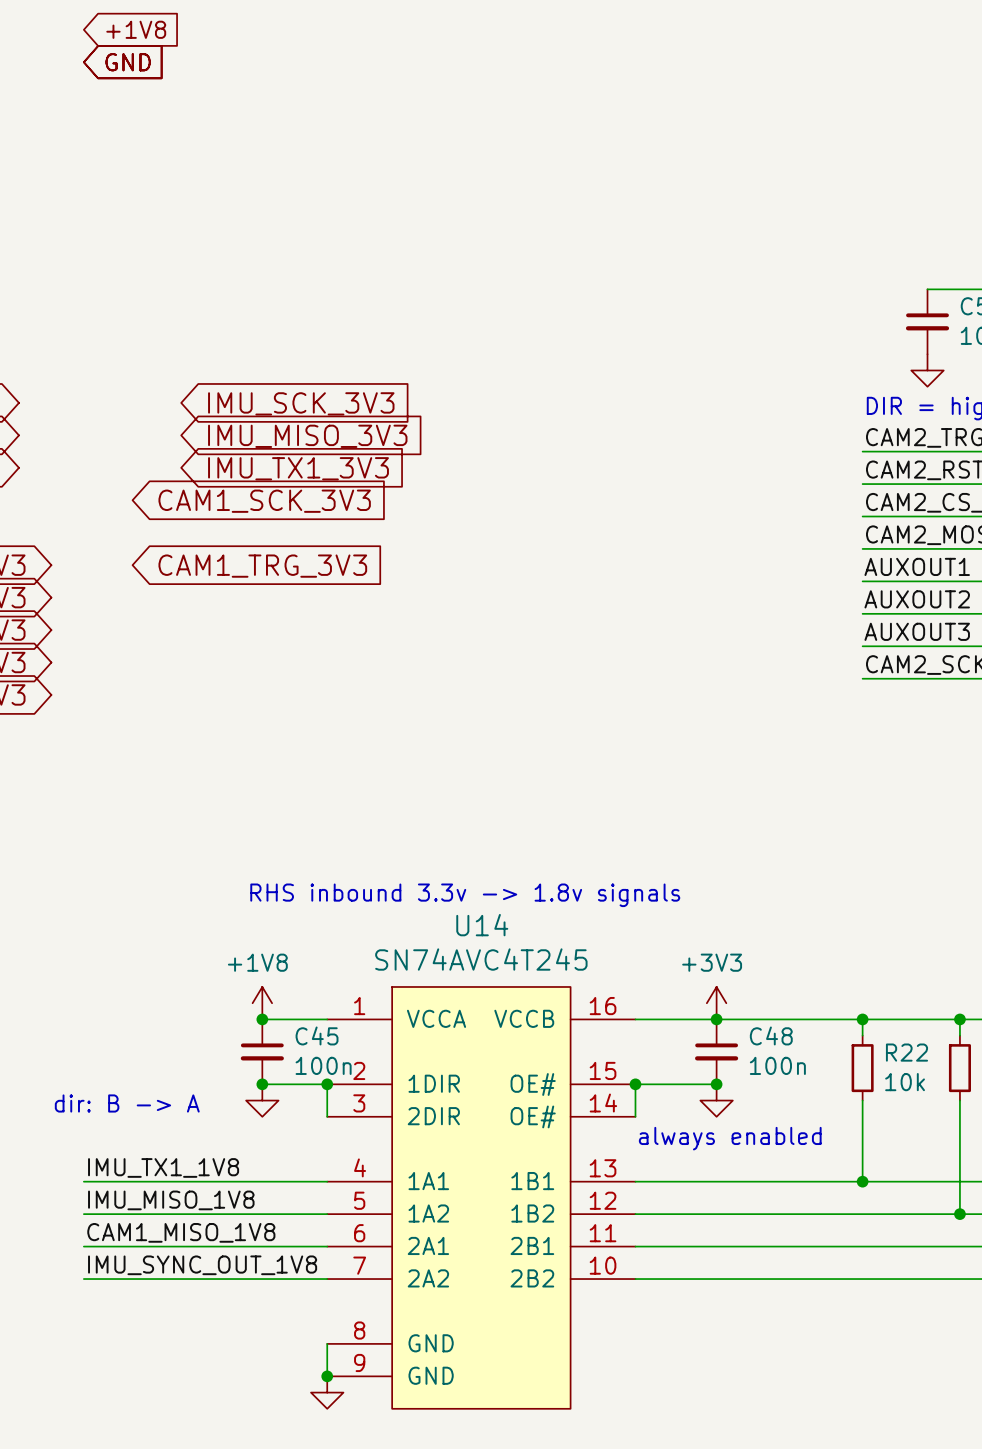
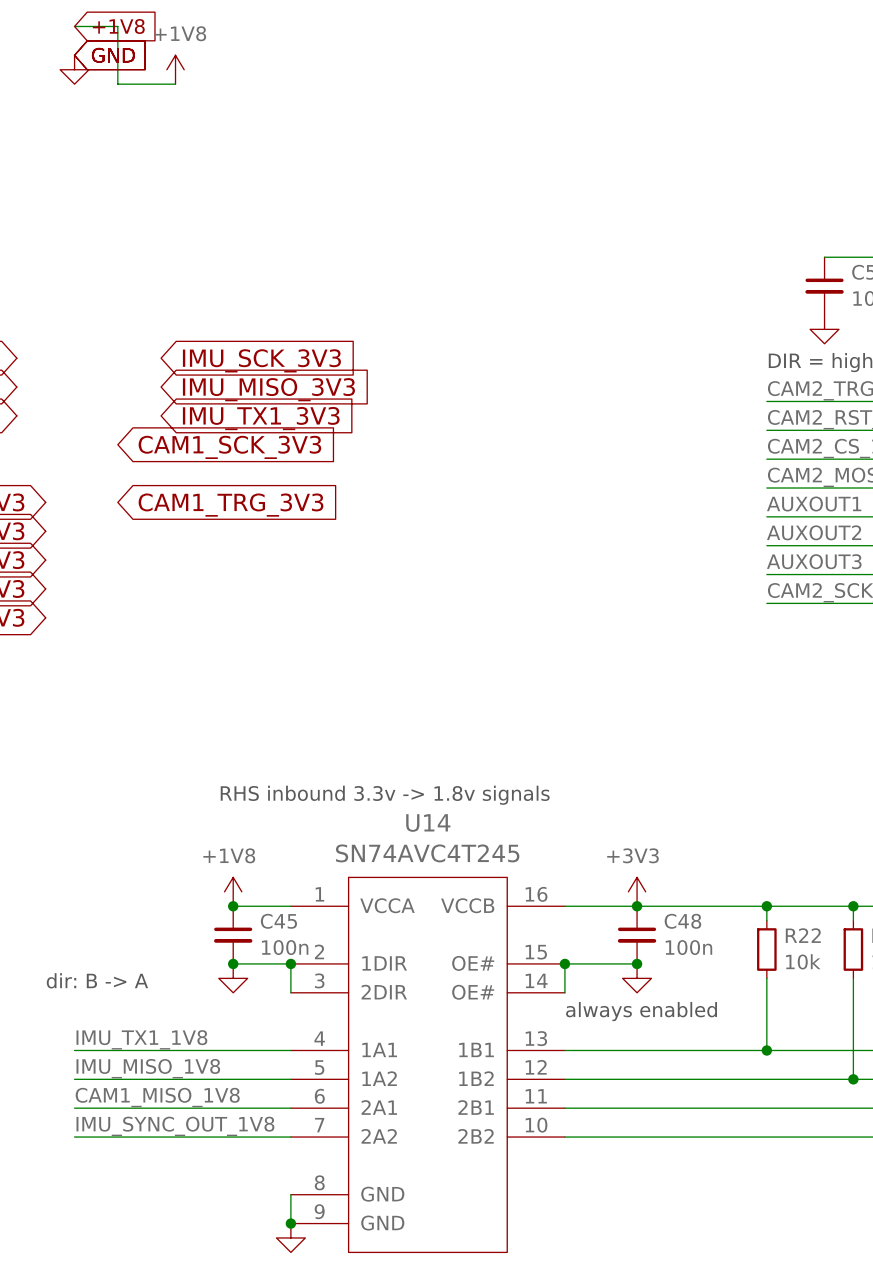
wire: none -> (74, 26) (117, 26) (117, 84) (175, 84)
power symbol: none -> (74, 69)
power symbol: none -> +1V8 (175, 69)

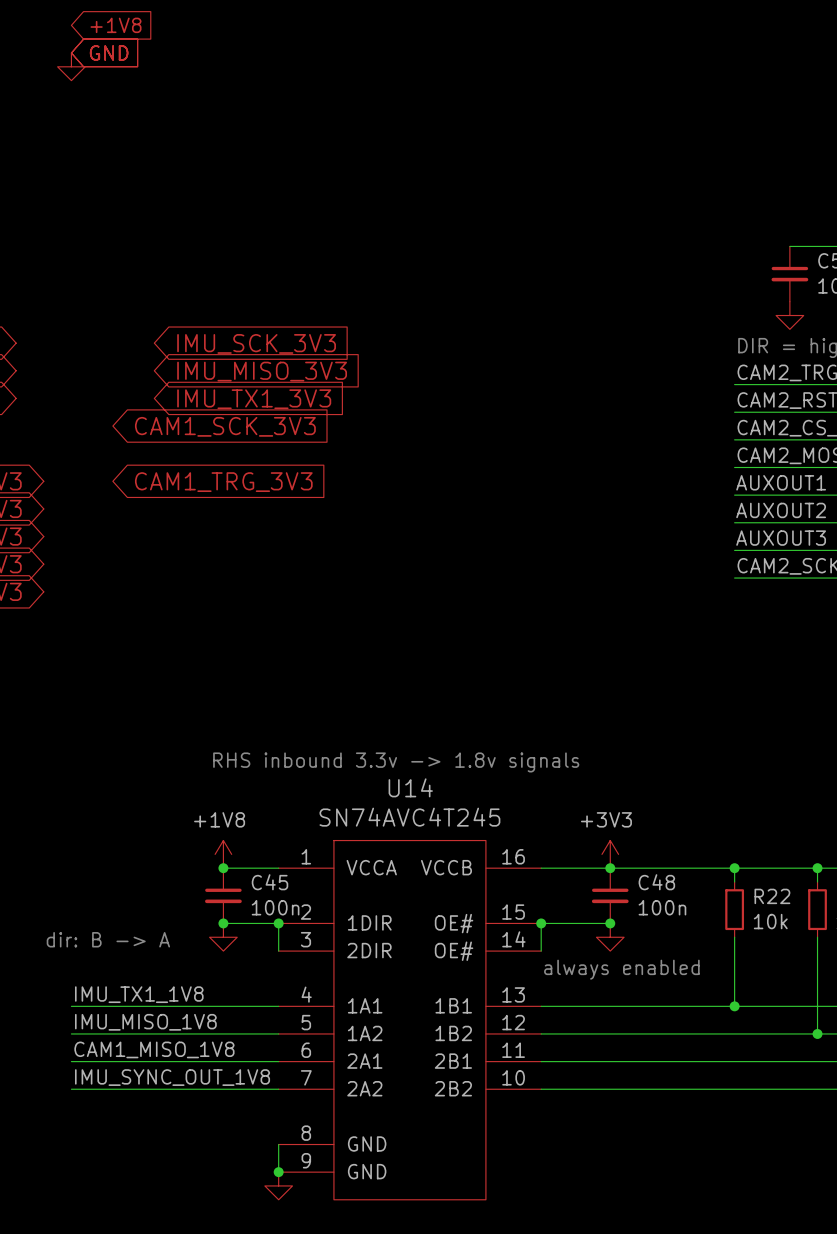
wire: (74, 26) (117, 26) (117, 84) (175, 84) -> none
power symbol: +1V8 (175, 69) -> none

